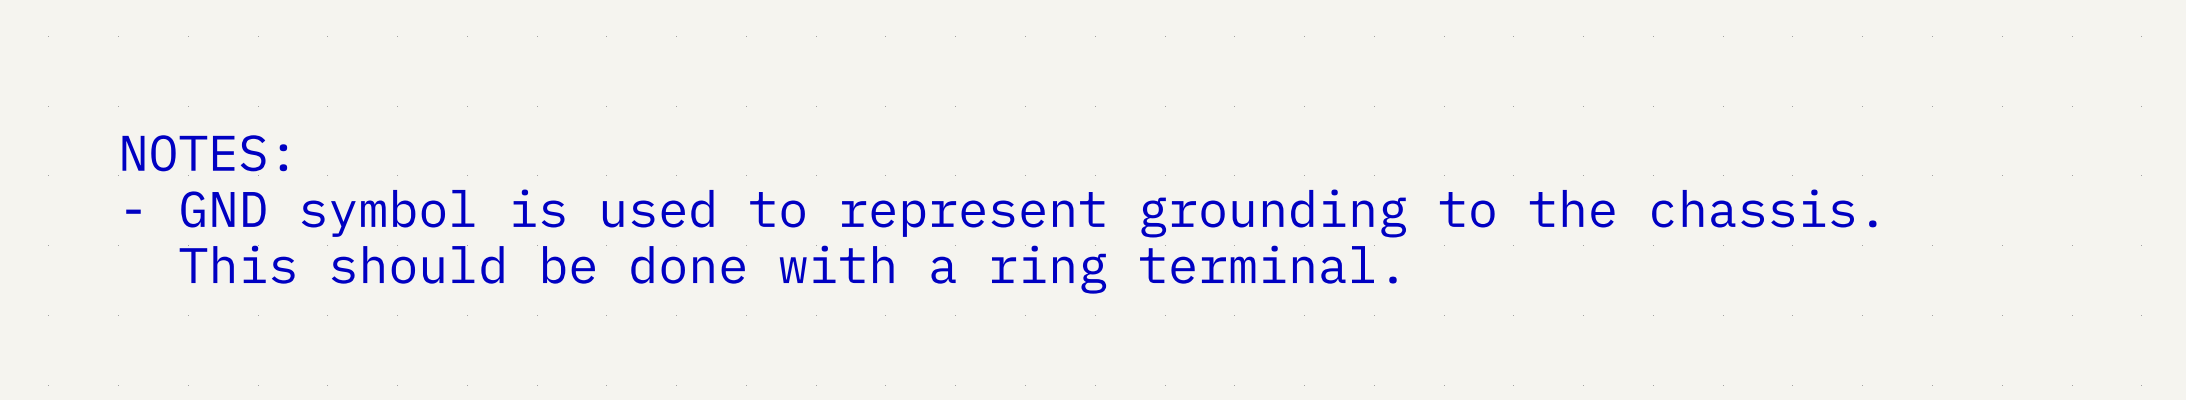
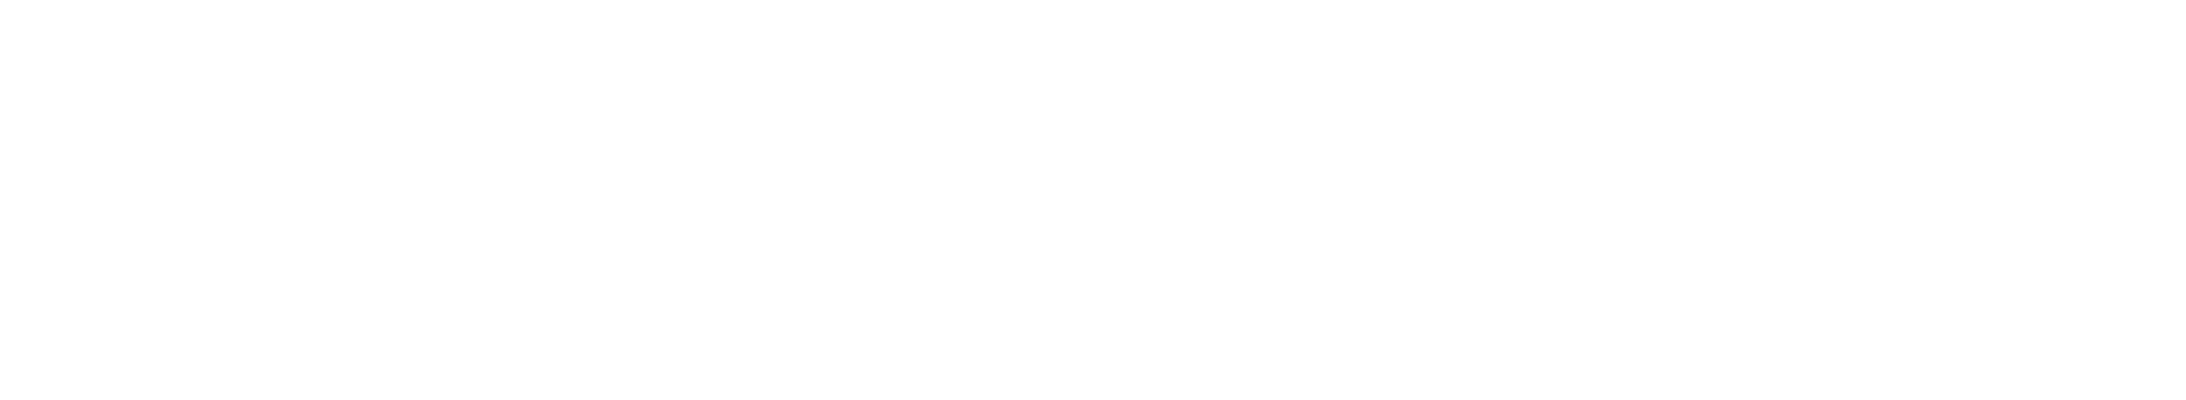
text: NOTES: (204, 153) -> none
text: - GND symbol is used to represent grounding to the chassis. (1001, 213) -> none
text: This should be done with a ring terminal. (788, 269) -> none

